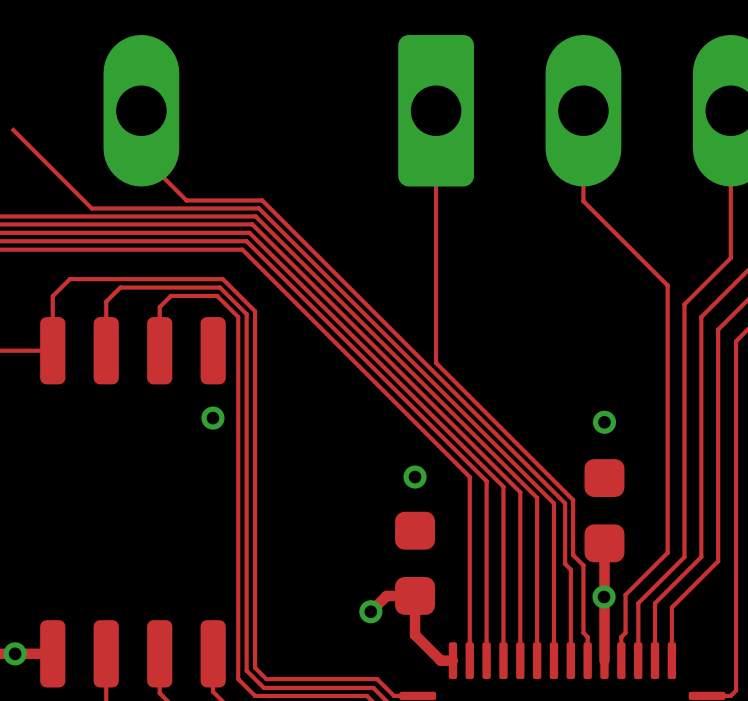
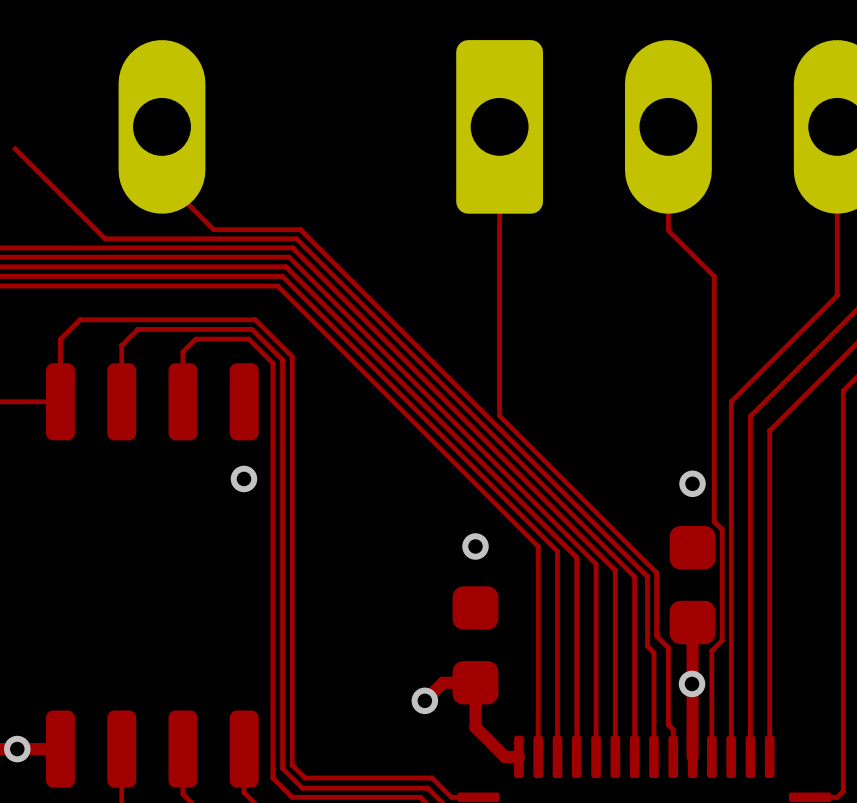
top track: (623, 241) (667, 285) (667, 552) (625, 594) (625, 632) (621, 636) -> (714, 276) (714, 521) (722, 529) (722, 640) (711, 650) (711, 729)
top track: (684, 304) (684, 557) (638, 603) -> (784, 348) (731, 401) (731, 690)
top track: (701, 317) (701, 557) (655, 603) -> (803, 363) (750, 416) (750, 691)
top track: (718, 329) (718, 561) (671, 607) -> (822, 377) (769, 430) (769, 696)

